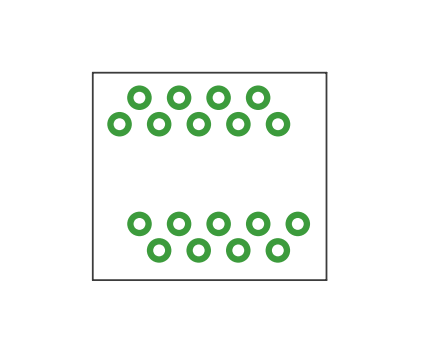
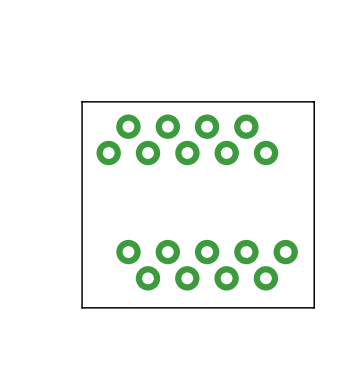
line: (326, 72) (92, 72) (92, 280) (326, 280) (326, 72) -> none
board edge: none -> (314, 101) (82, 101) (82, 307) (314, 307) (314, 101)

